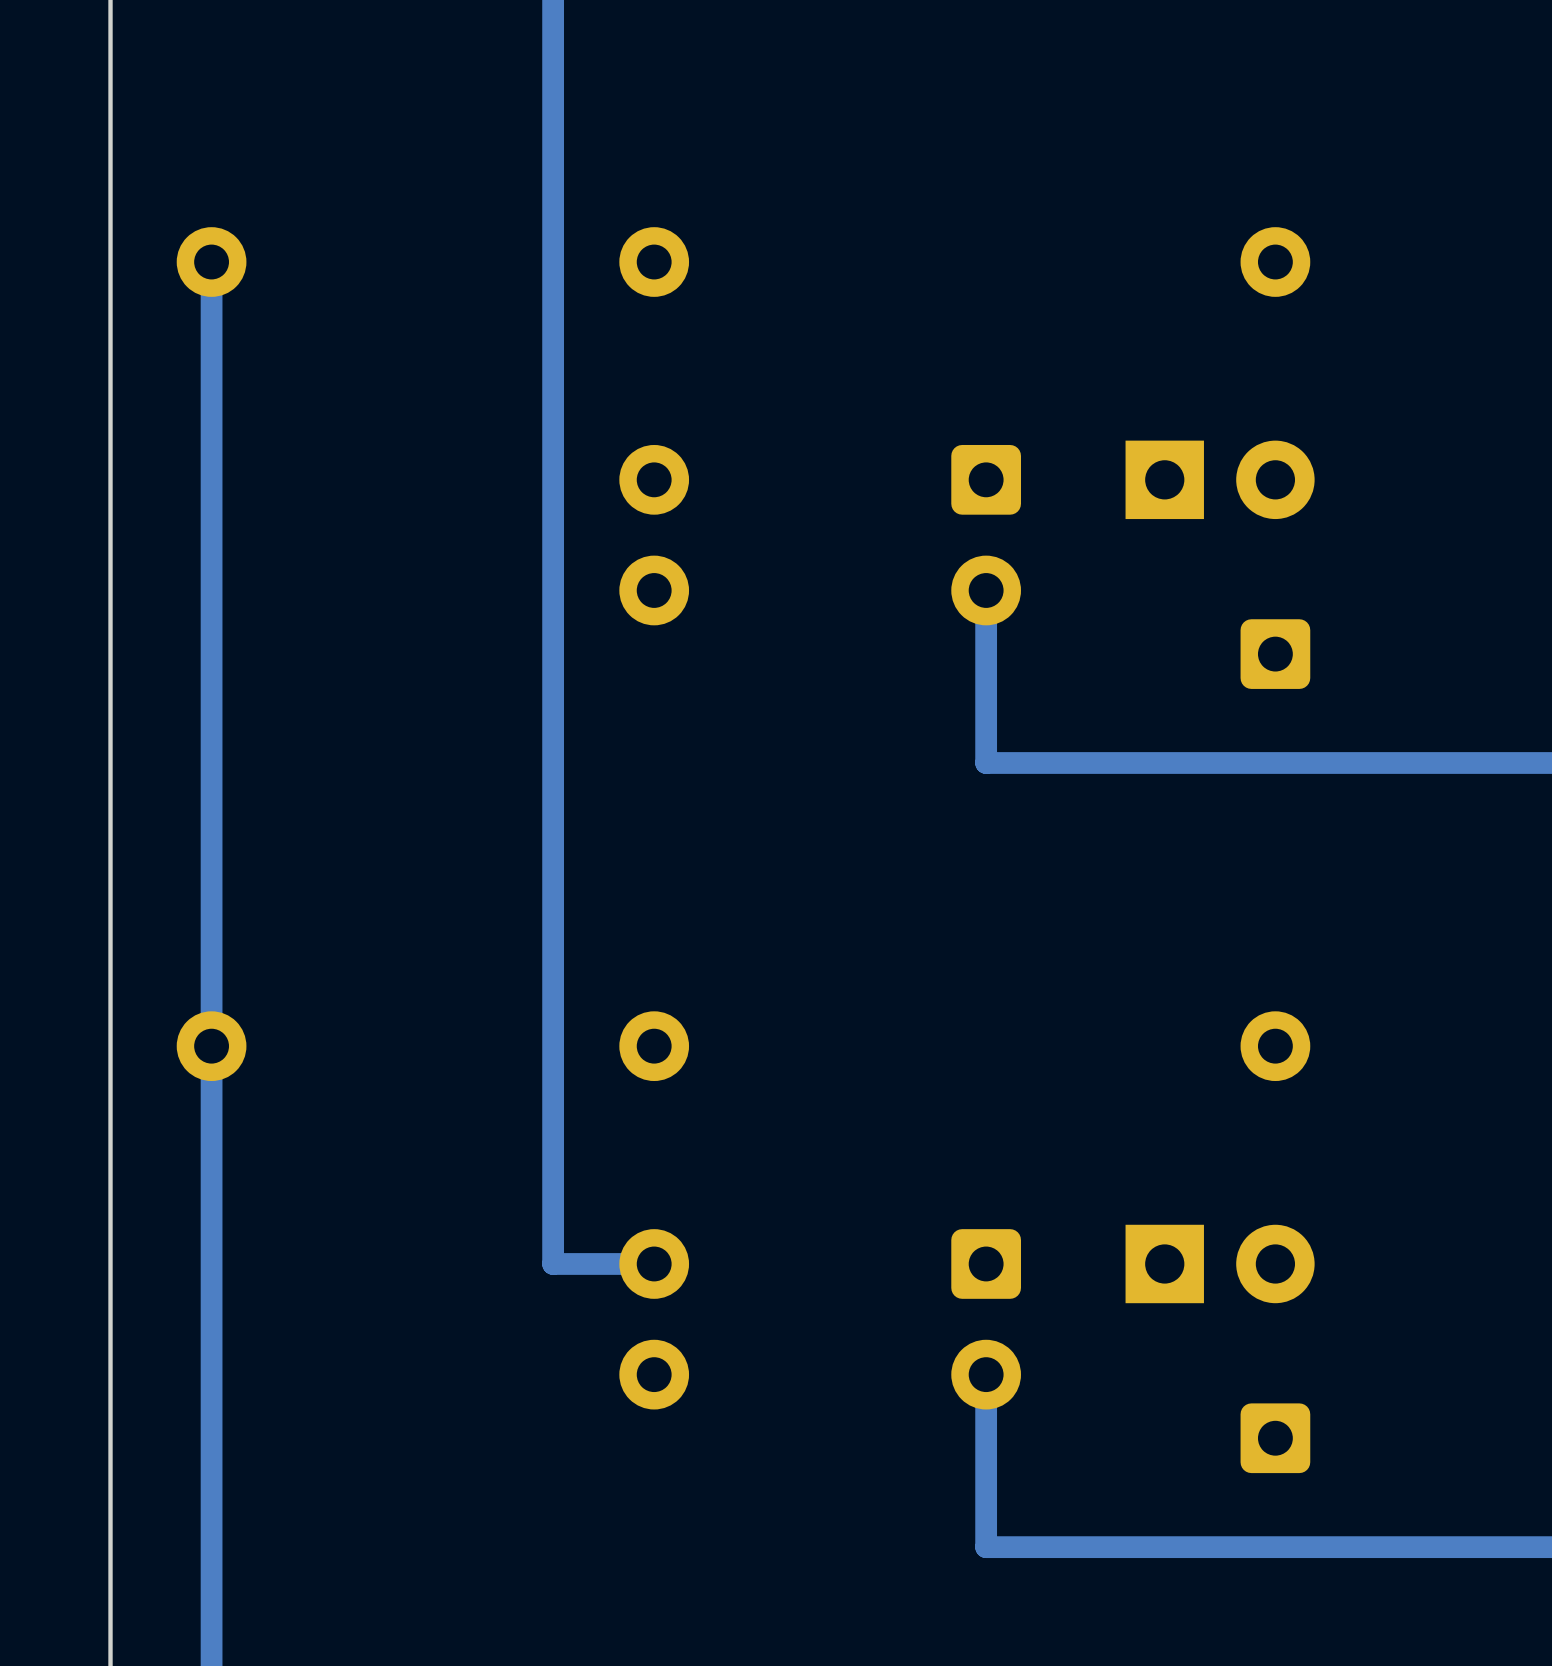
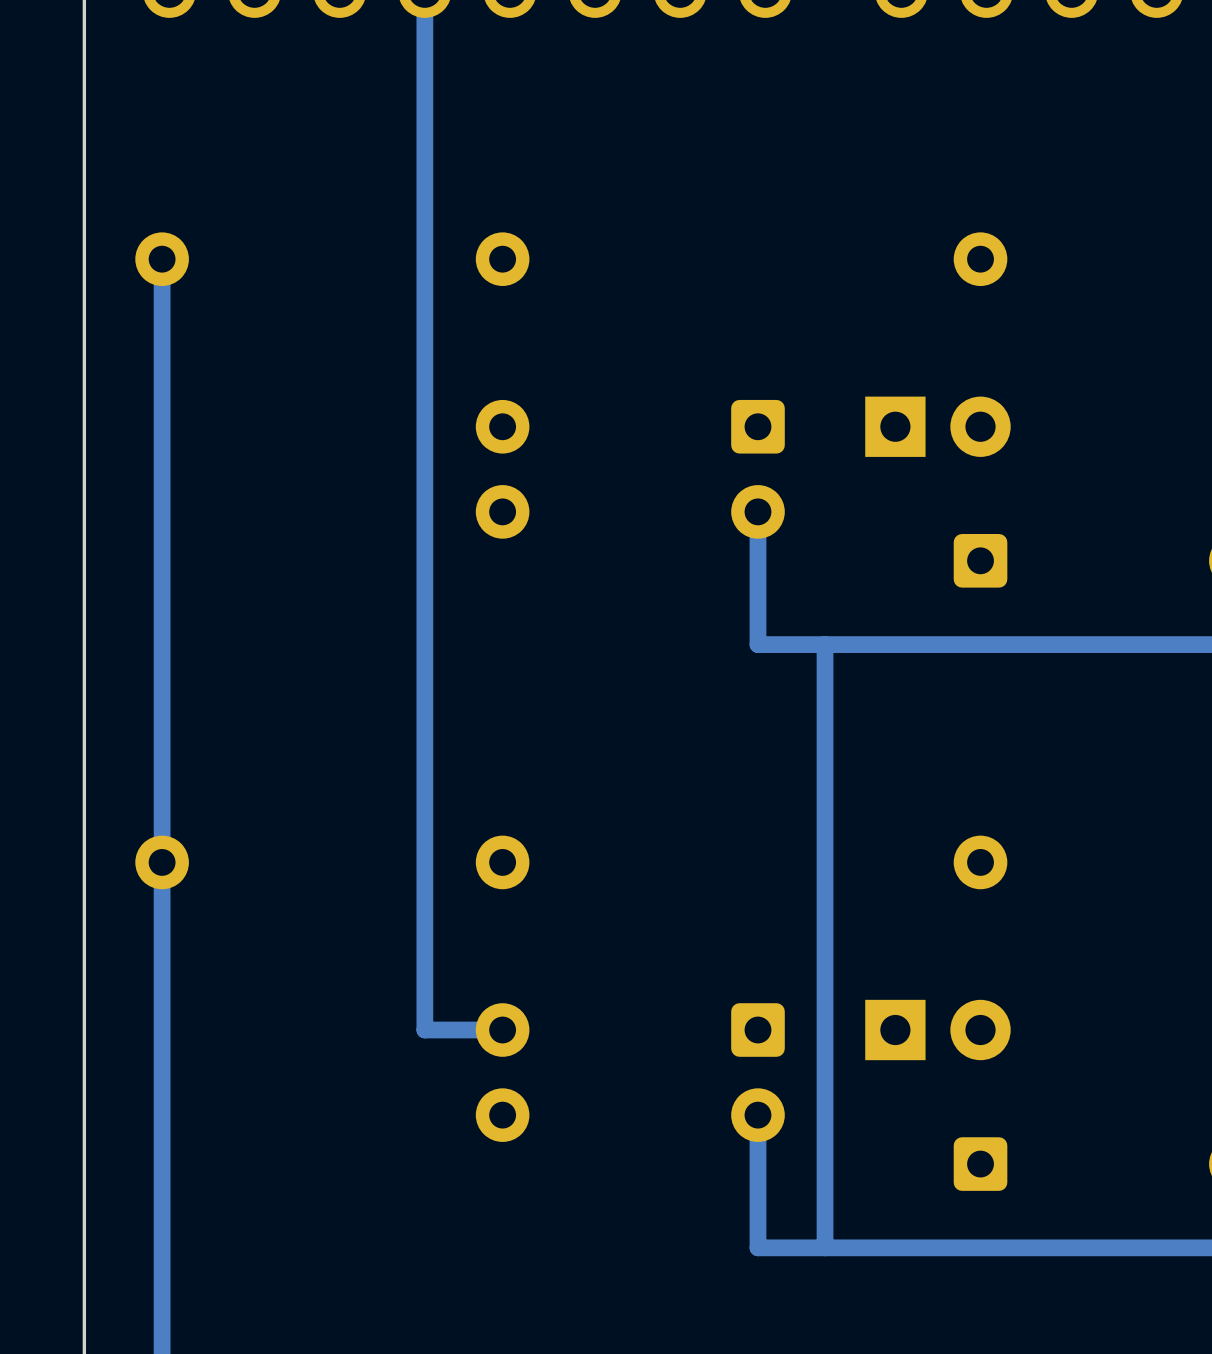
track: none -> (825, 644) (825, 1247)

